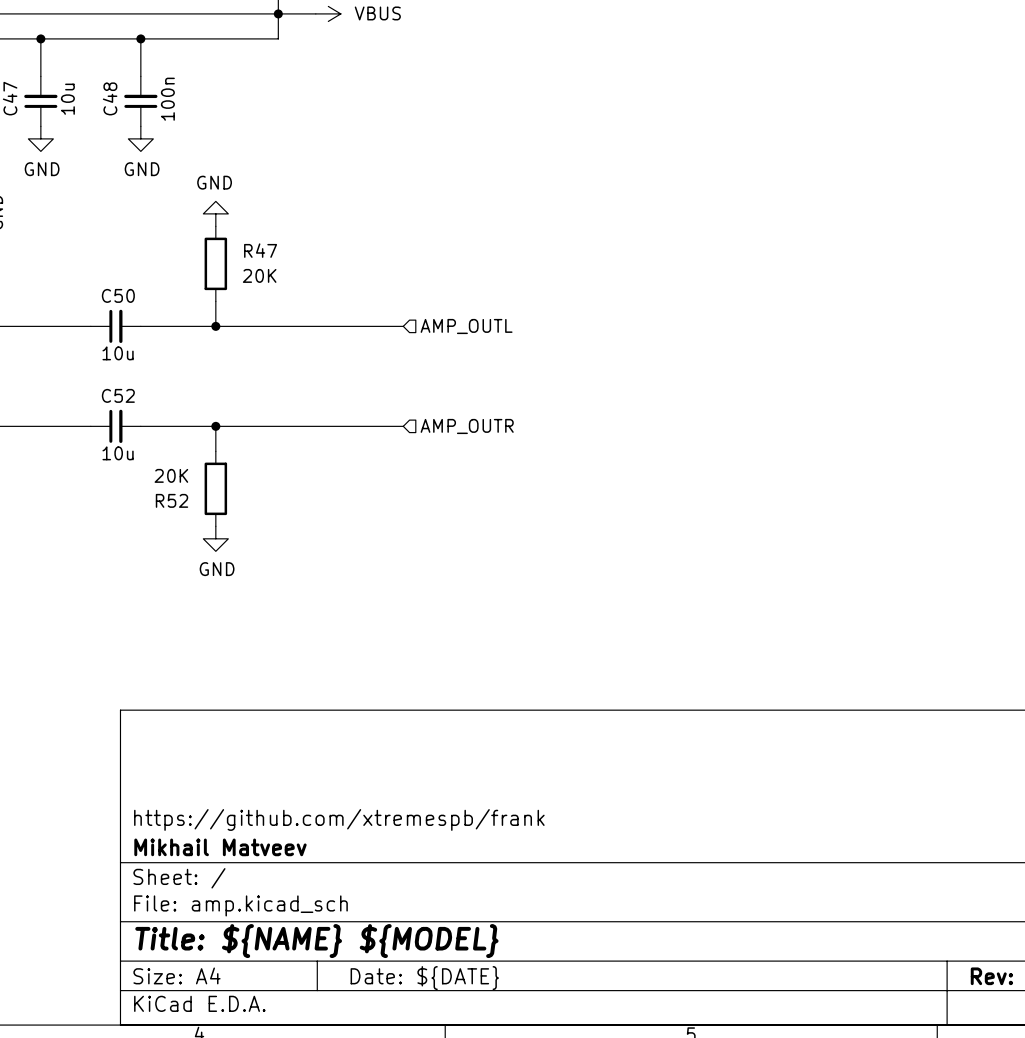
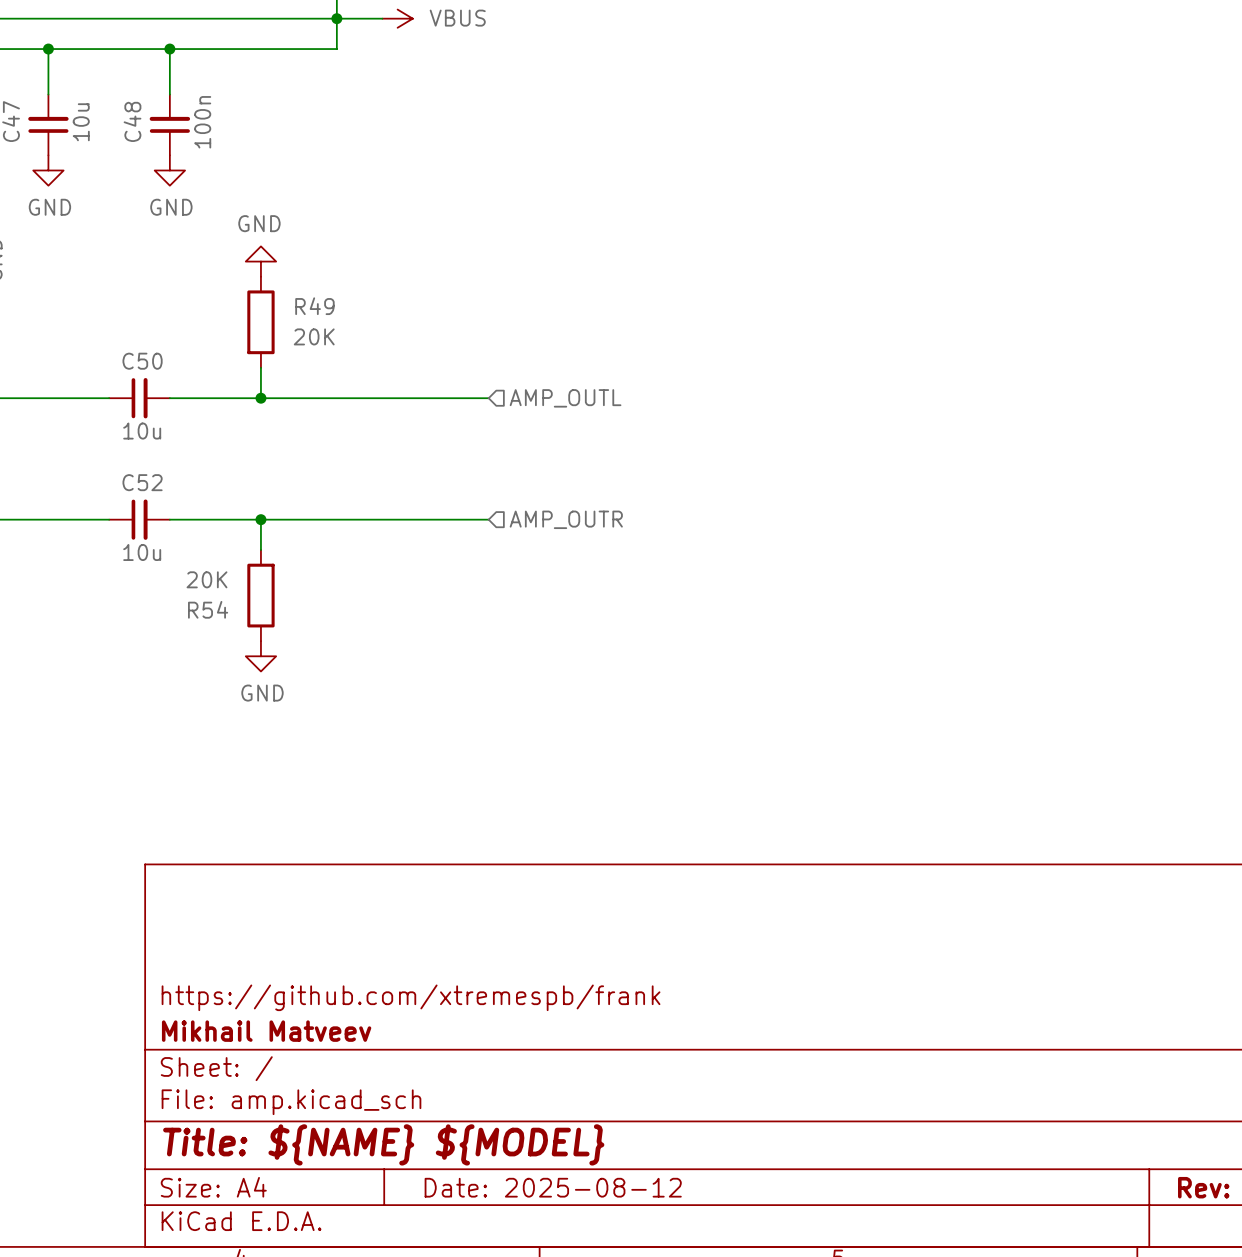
R47 name: R47 (260, 250) -> R49 (314, 306)
R52 name: R52 (172, 500) -> R54 (208, 609)
title block: Date: ${DATE} (424, 978) -> Date: 2025-08-12 (553, 1187)

